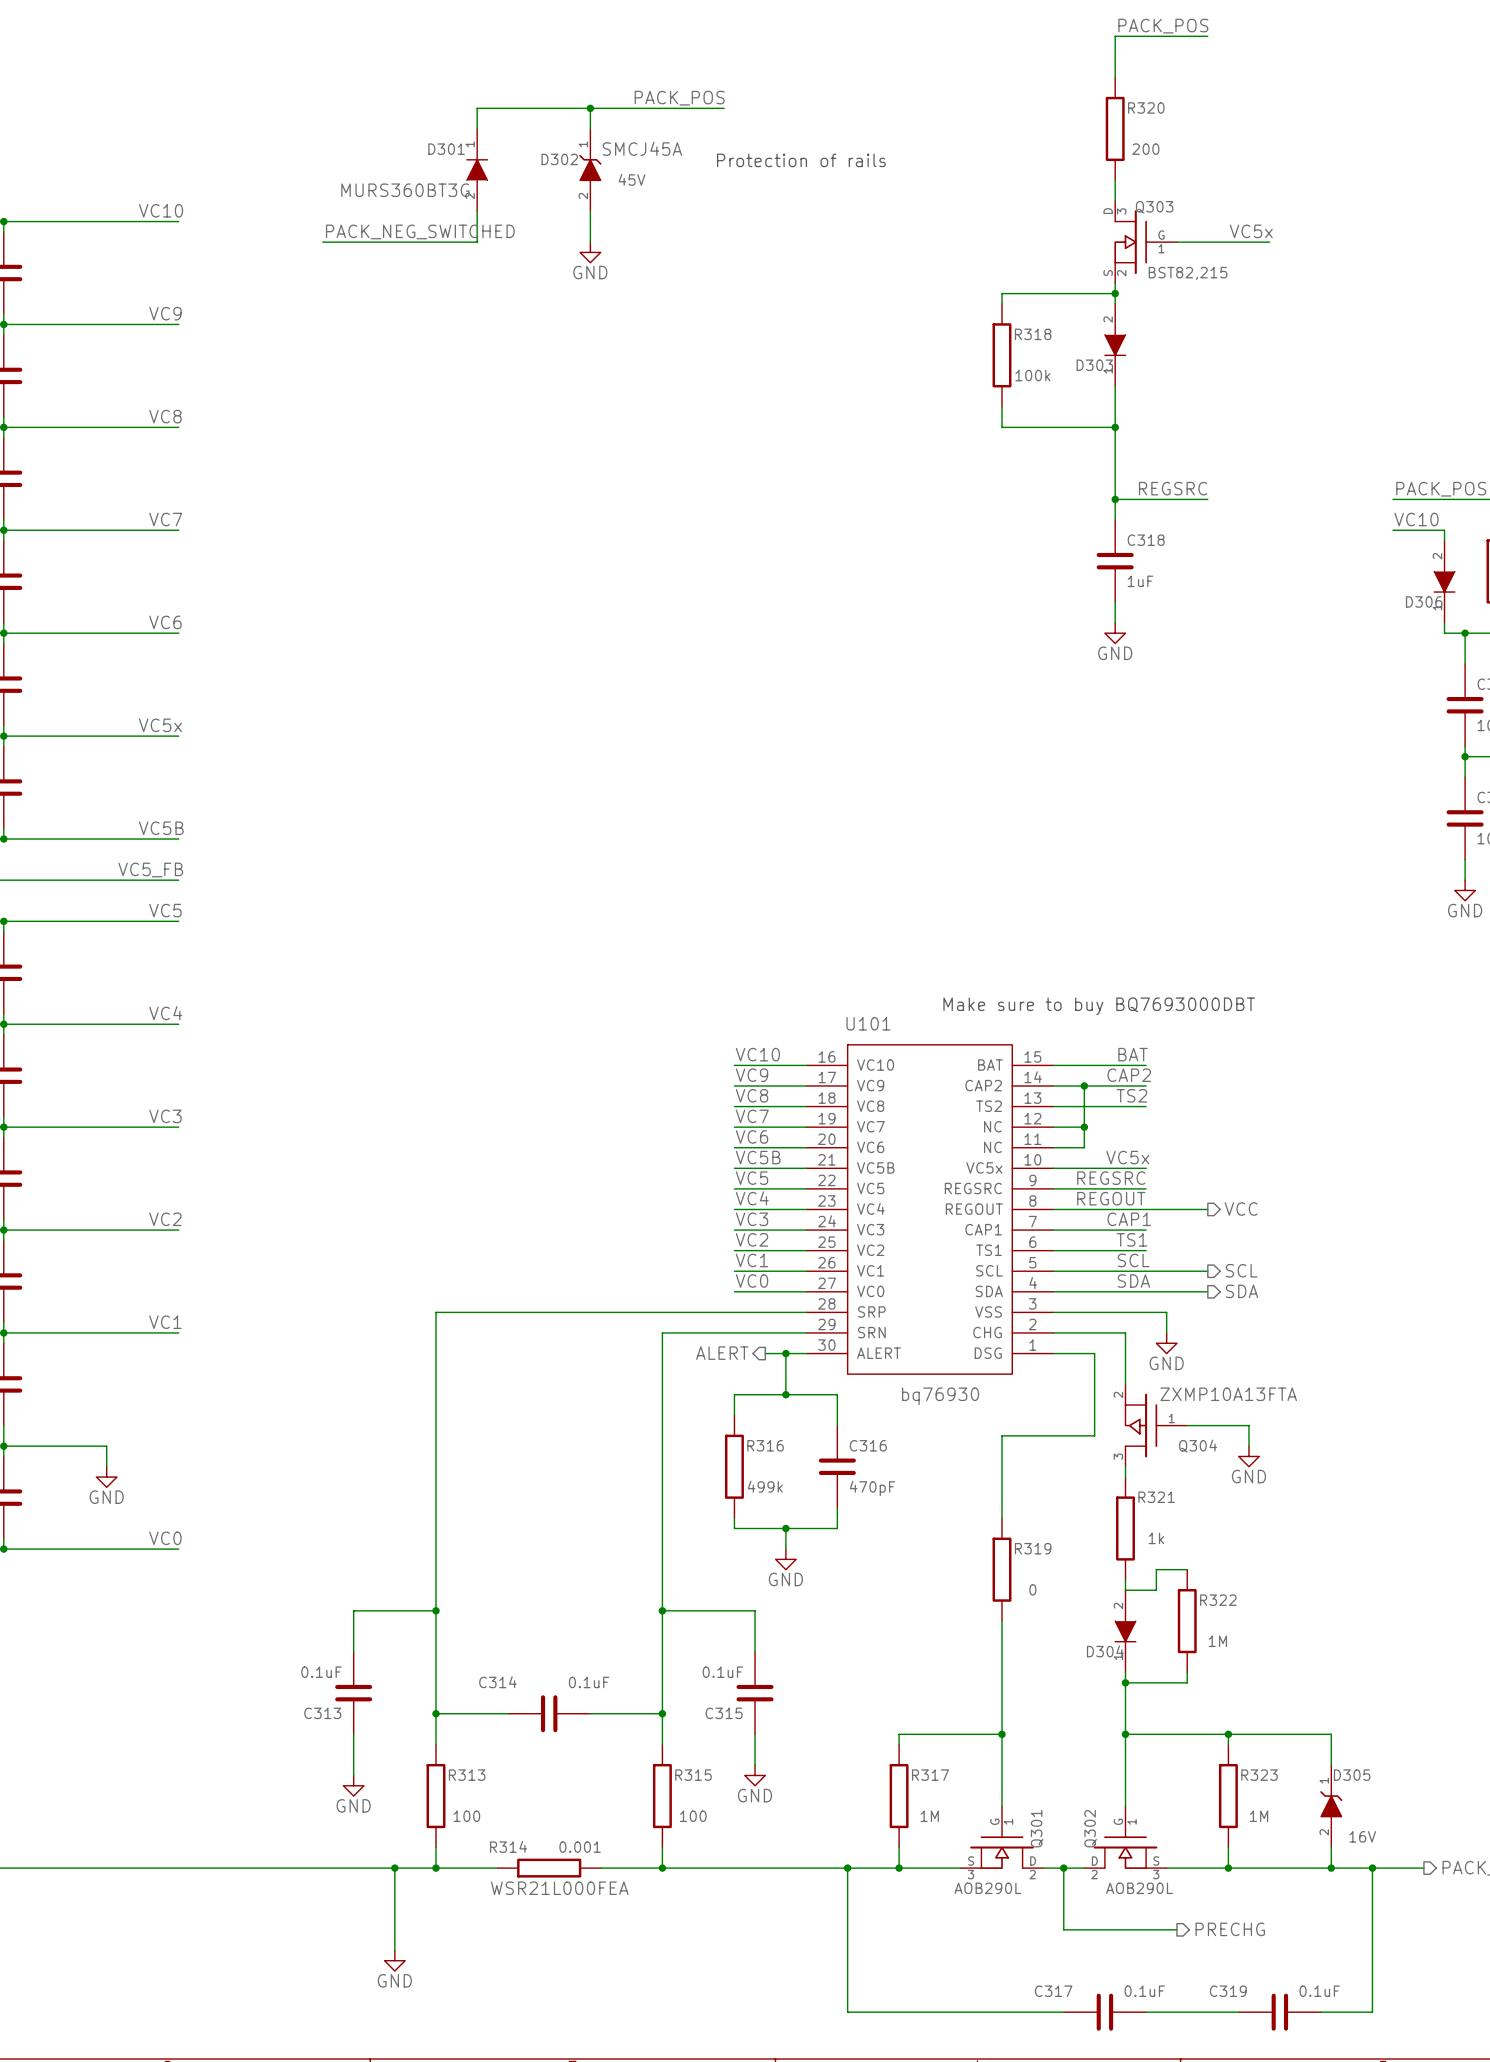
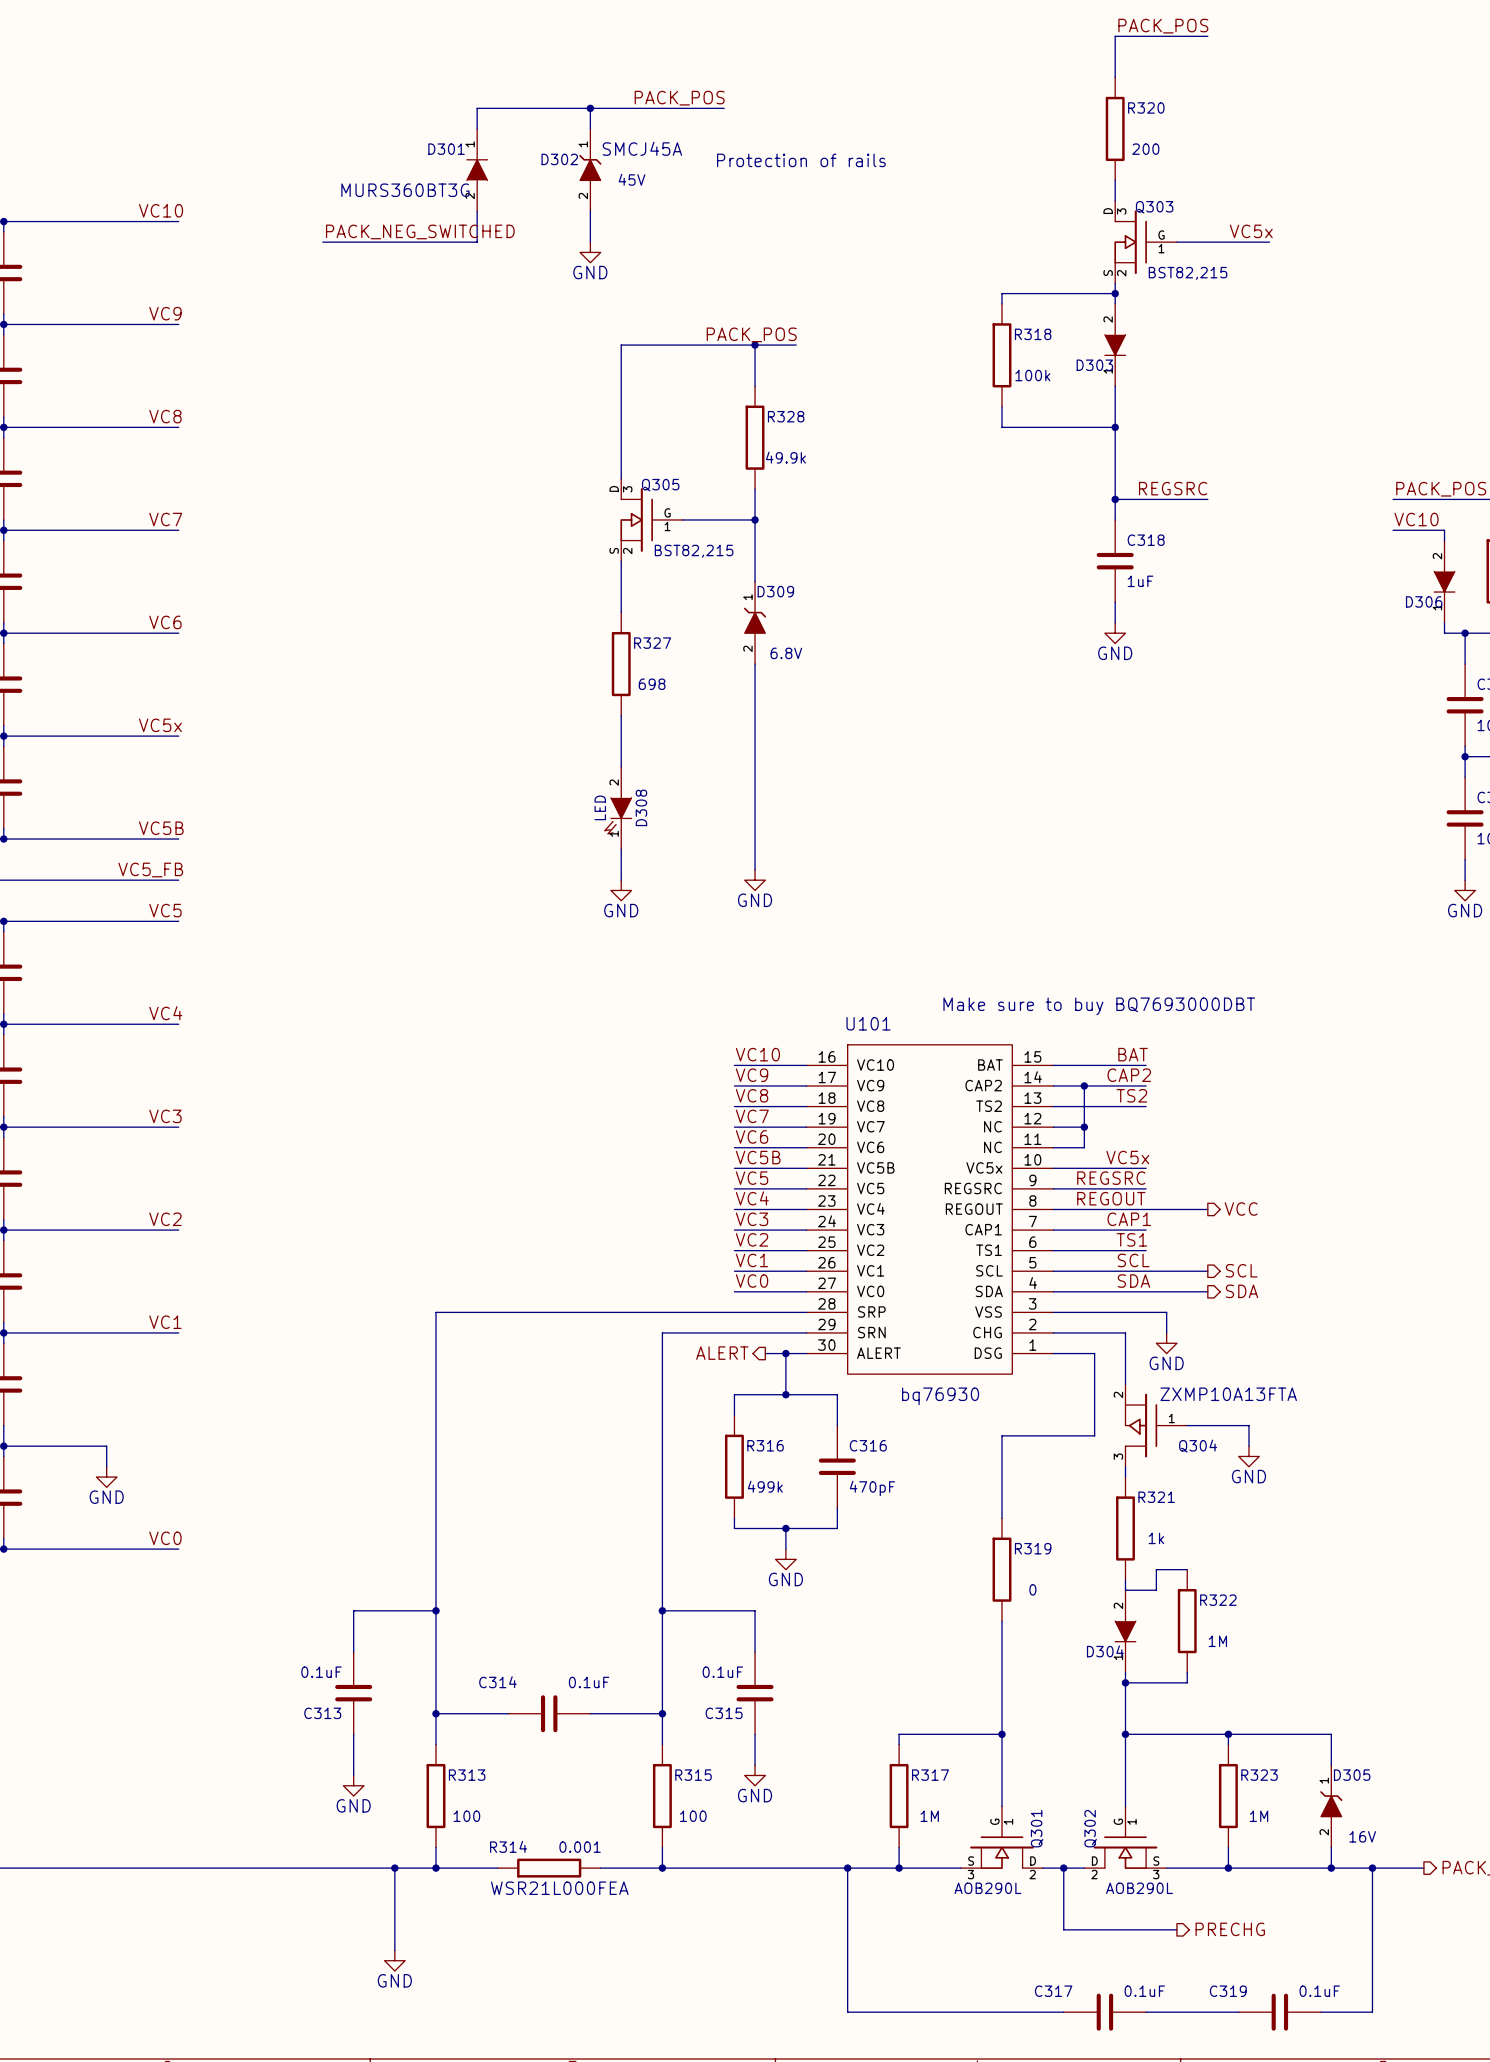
label: none -> PACK_POS (751, 334)
wire: none -> (755, 345) (755, 386)
junction: none -> (755, 345)
wire: none -> (796, 345) (621, 345) (621, 478)
R328: none -> 49.9k (755, 437)
wire: none -> (755, 489) (755, 581)
Q305: none -> BST82,215 (651, 519)
wire: none -> (682, 519) (755, 519)
junction: none -> (755, 519)
wire: none -> (621, 561) (621, 612)
D309: none -> 6.8V (755, 622)
R327: none -> 698 (621, 664)
wire: none -> (755, 664) (755, 869)
wire: none -> (621, 715) (621, 766)
D308: none -> LED (618, 808)
wire: none -> (621, 849) (621, 880)
power symbol: none -> GND (755, 880)
power symbol: none -> GND (621, 890)

